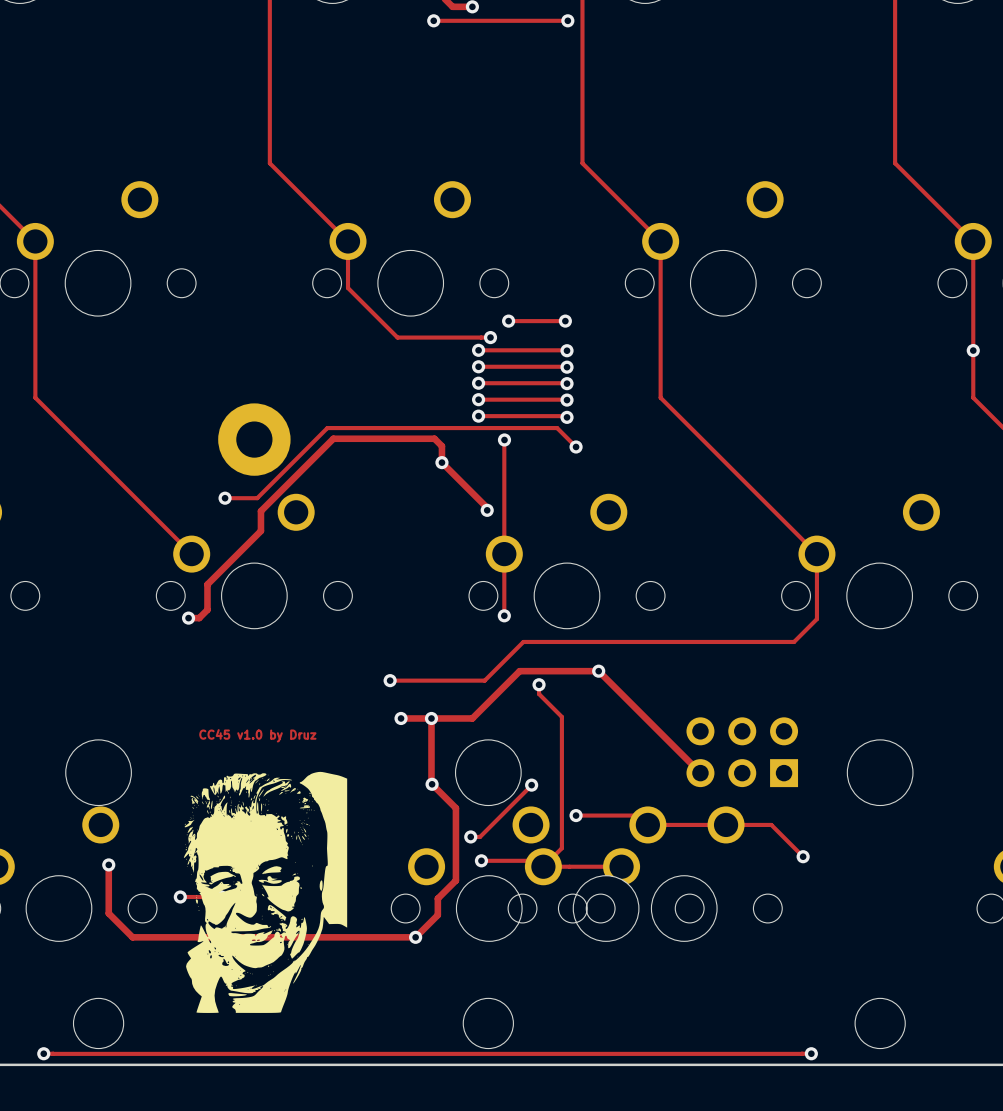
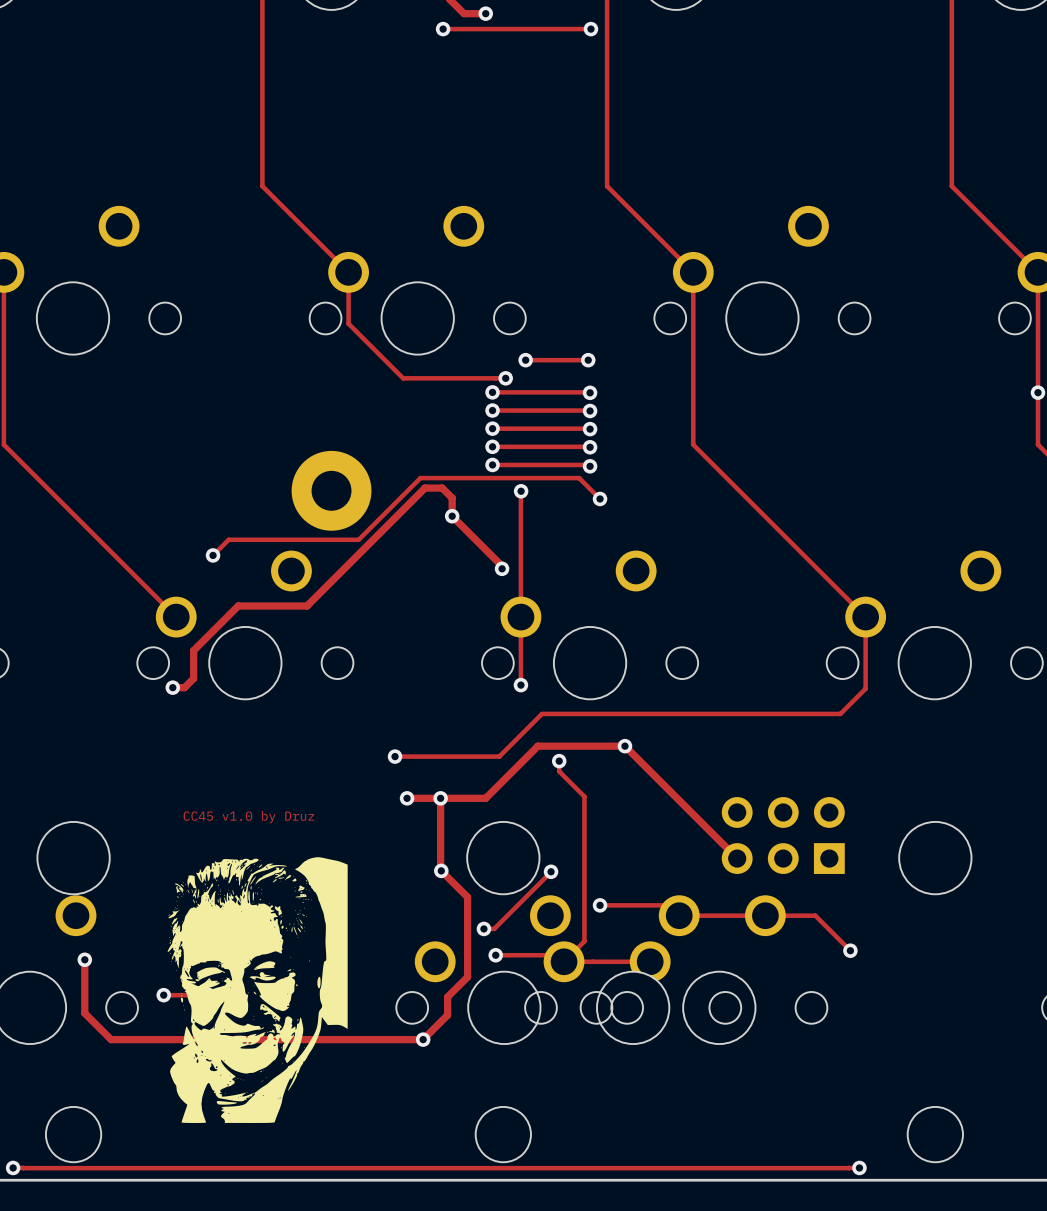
track: (413, 428) (327, 428) (257, 498) (225, 498) -> (420, 478) (358, 539) (228, 539) (213, 555)
track: (434, 438) (333, 438) (260, 511) (260, 531) (247, 544) -> (444, 489) (442, 488) (424, 488) (307, 606) (238, 606)
part position: (254, 439) -> (331, 490)

